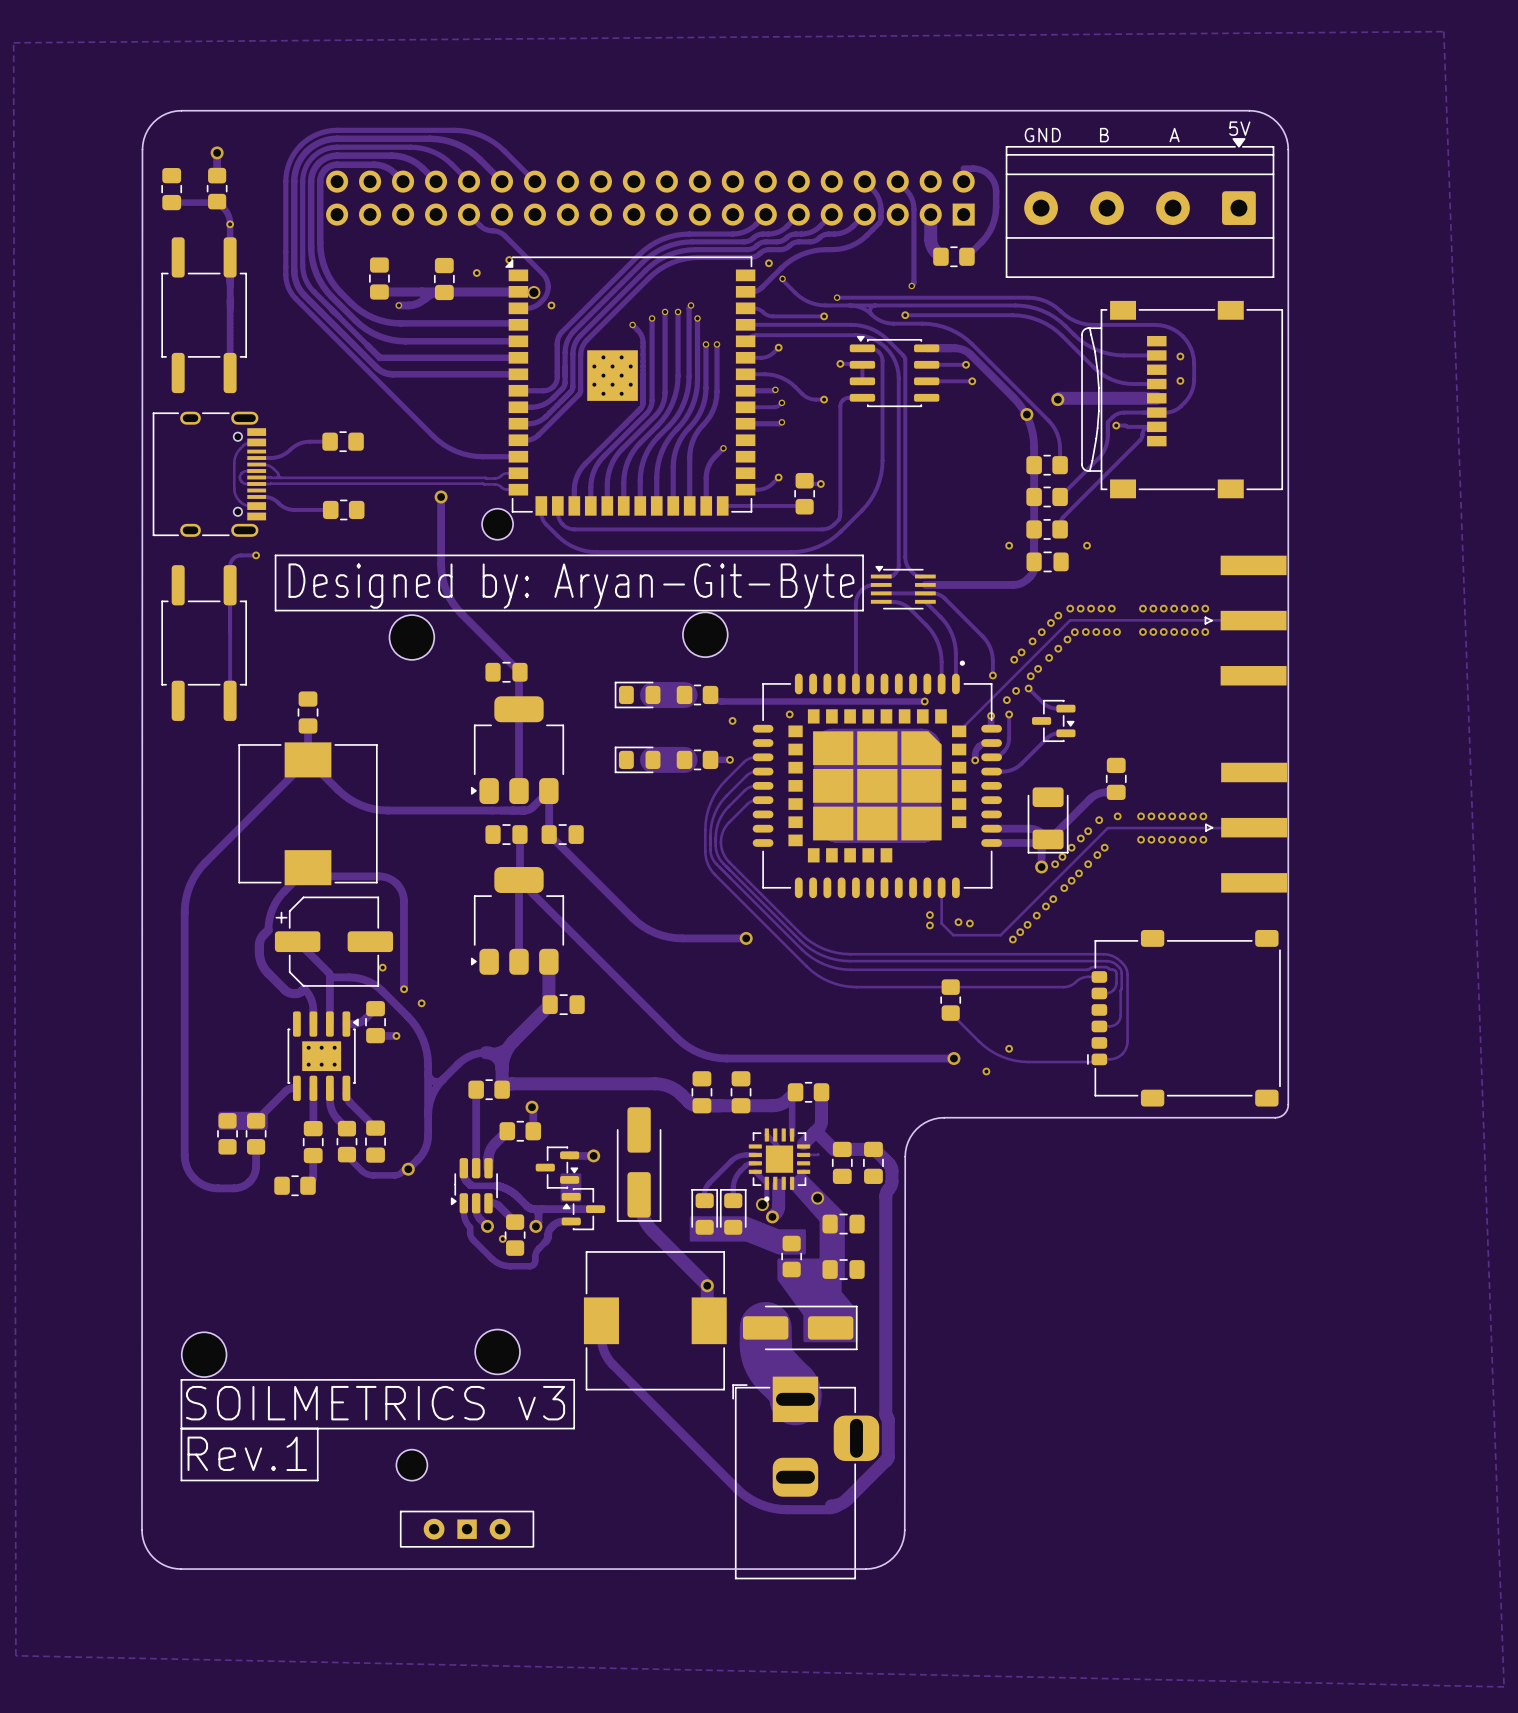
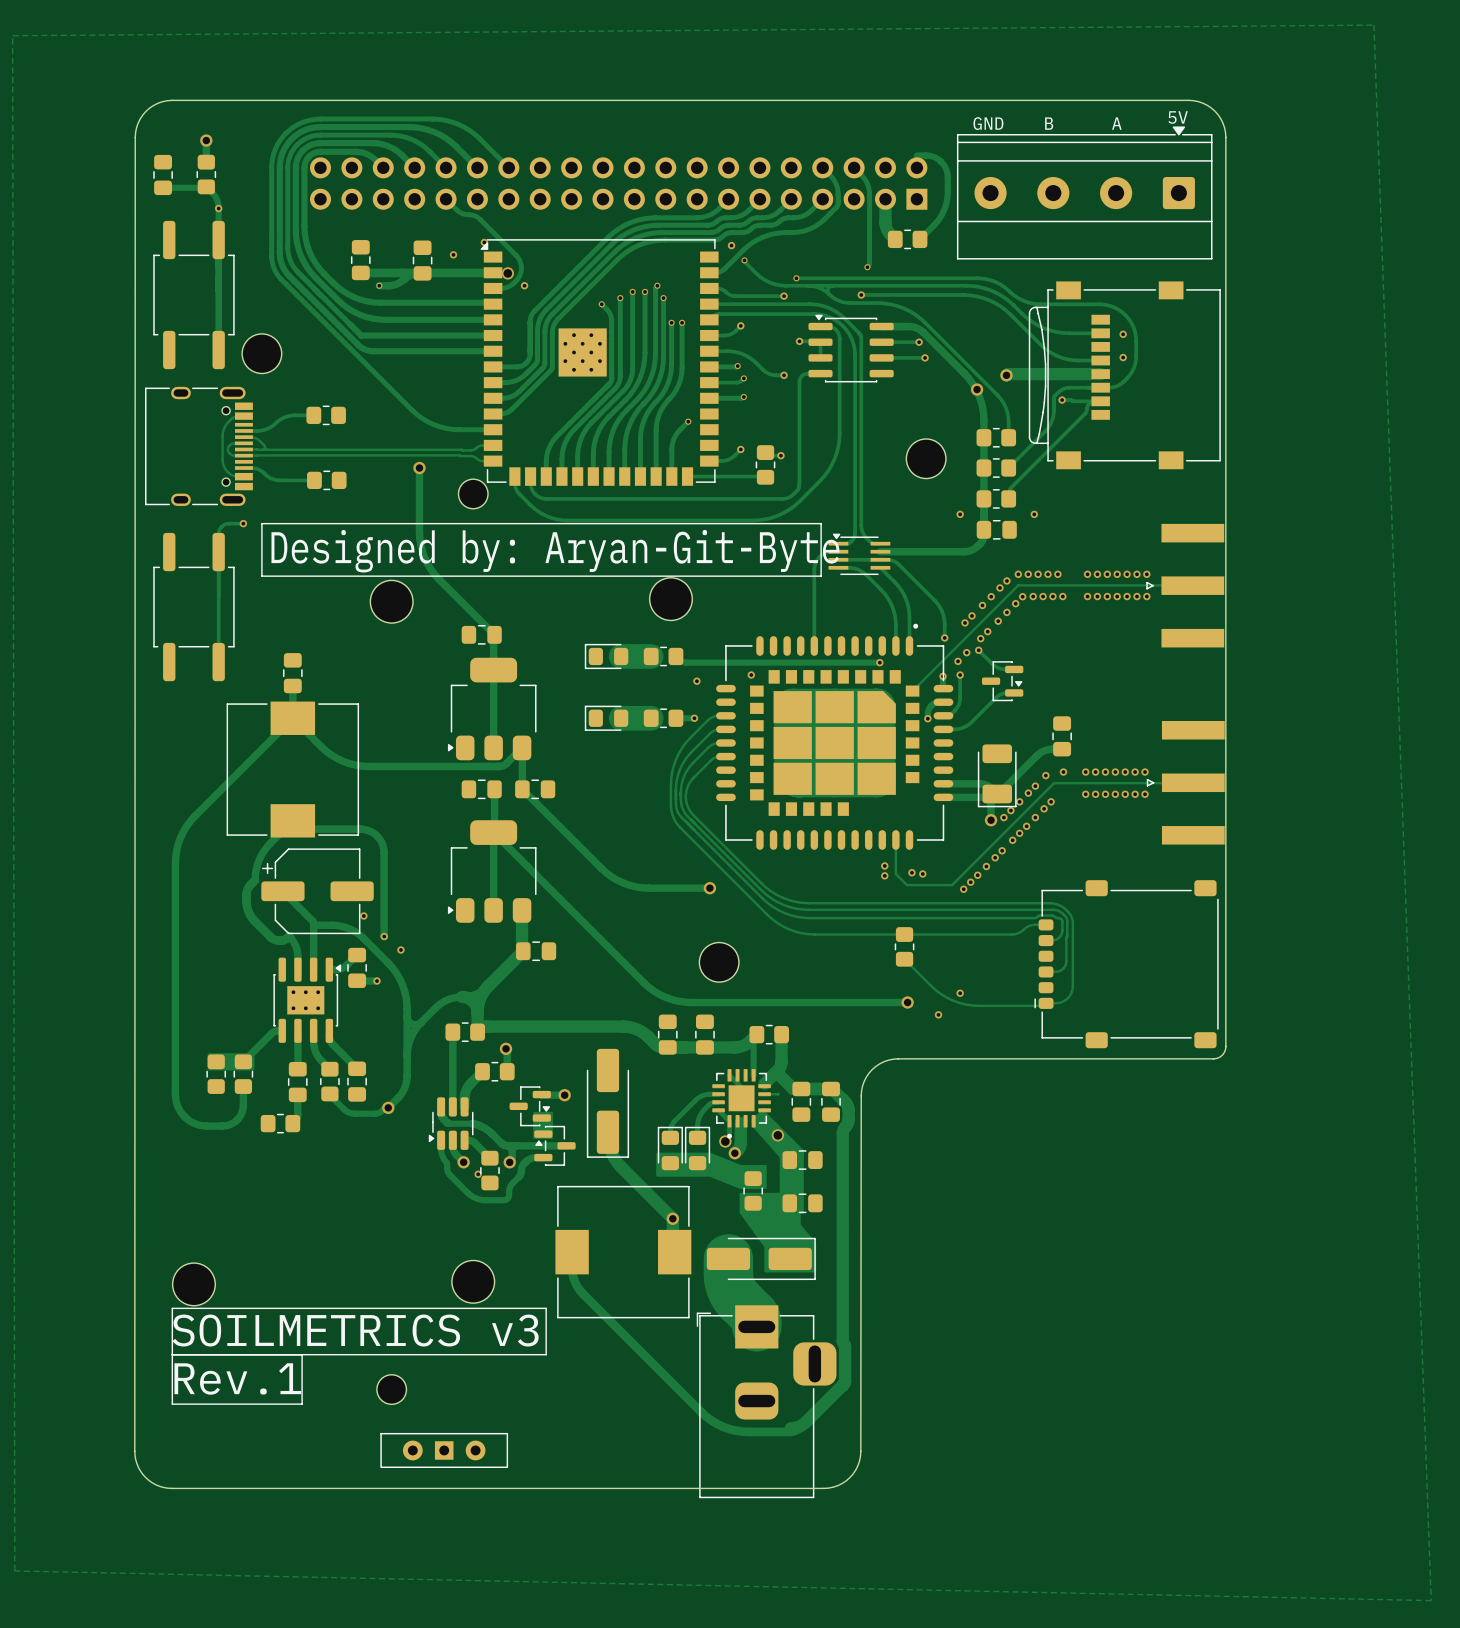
part: none -> (261, 353)
part: none -> (926, 458)
part: none -> (719, 962)

